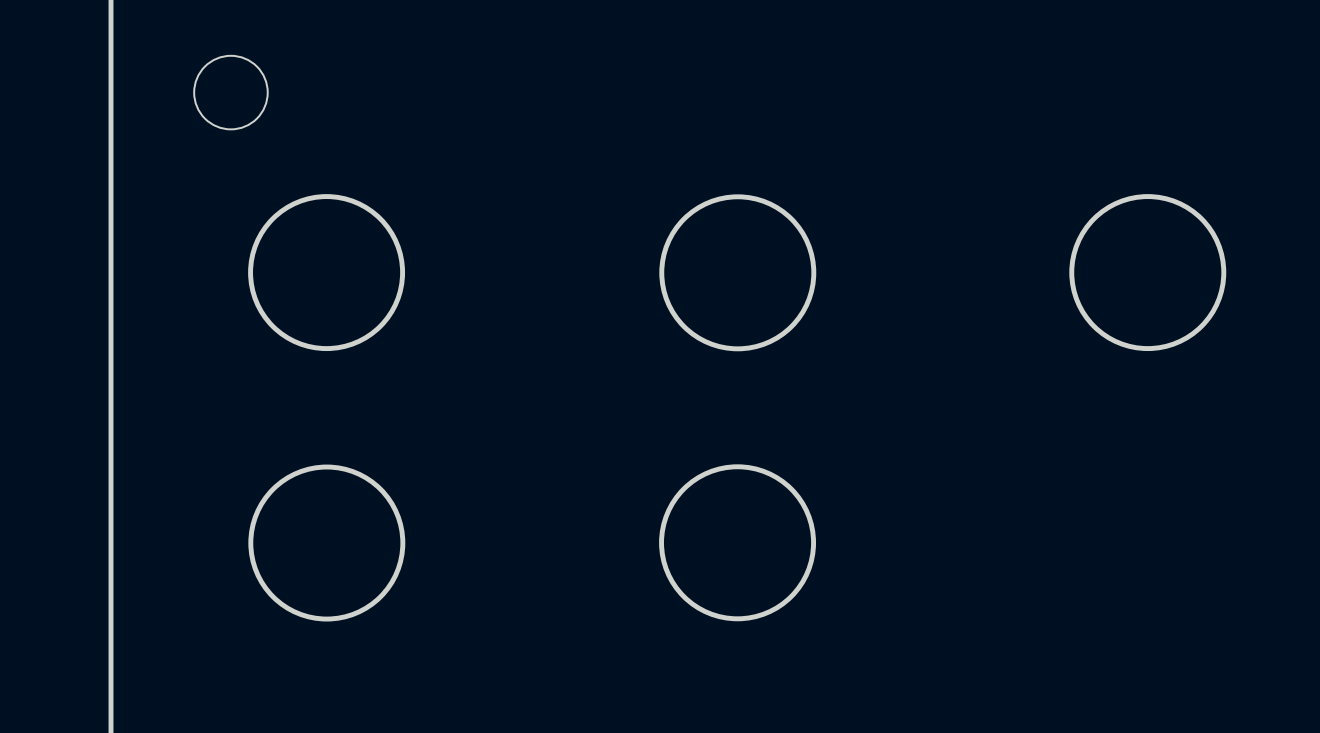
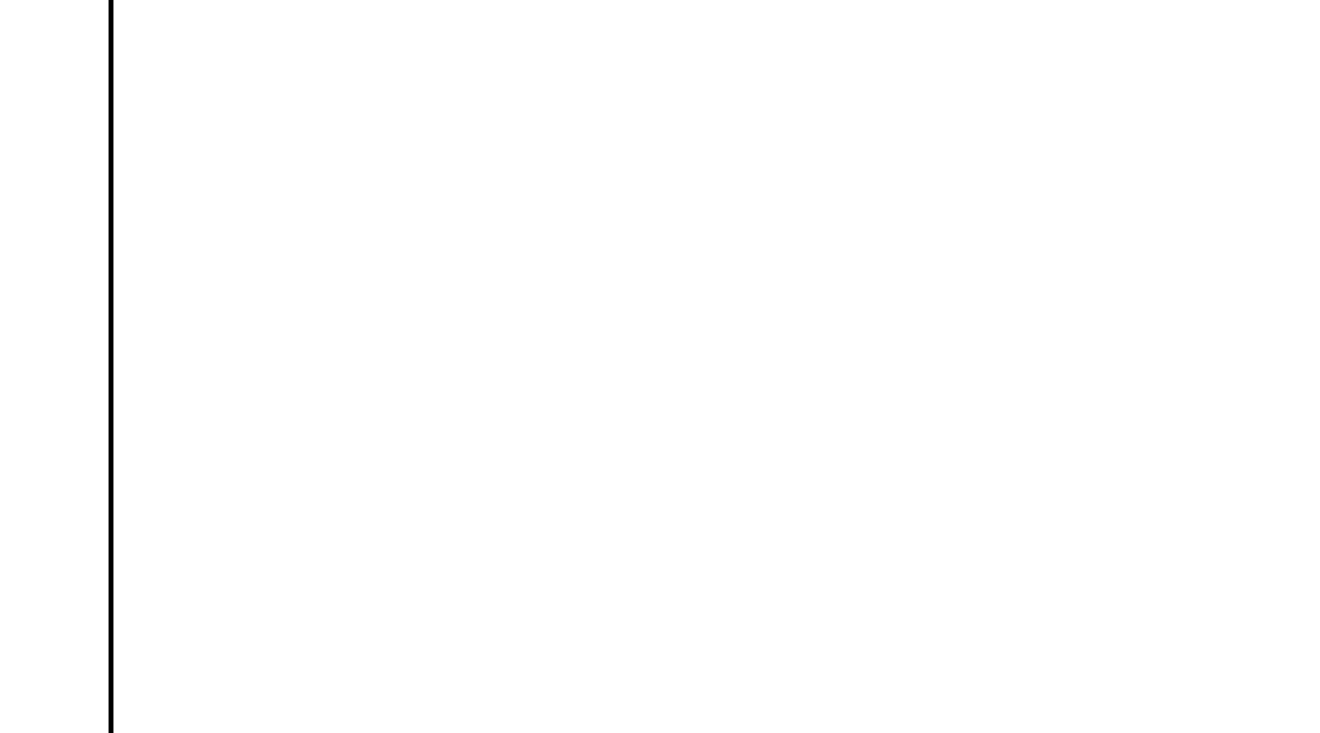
round board edge: [193, 55, 269, 130] -> none
round board edge: [248, 194, 406, 352] -> none
round board edge: [659, 194, 817, 352] -> none
round board edge: [1069, 194, 1227, 352] -> none
round board edge: [248, 464, 406, 622] -> none
round board edge: [659, 464, 817, 622] -> none

